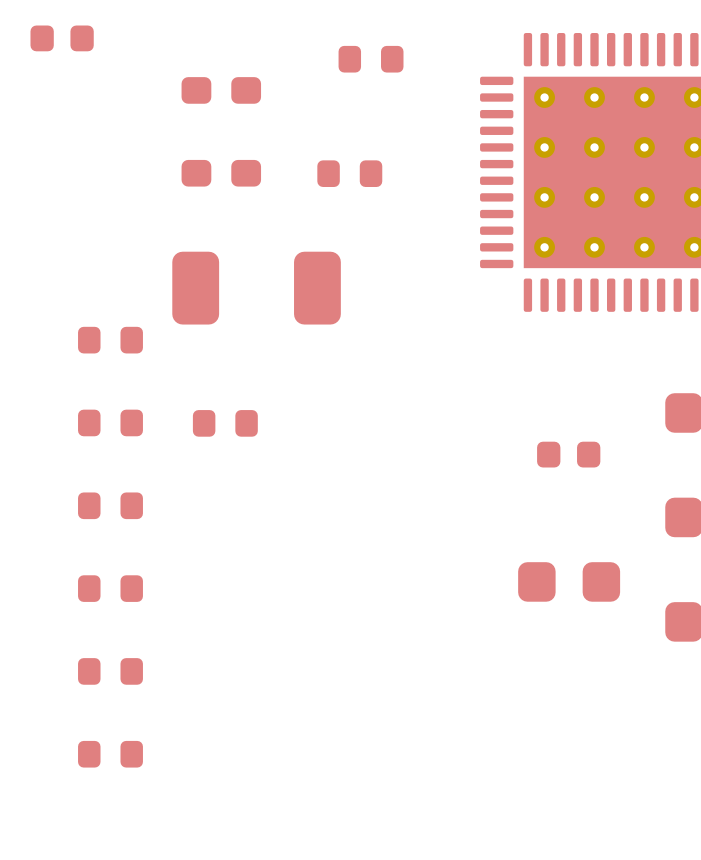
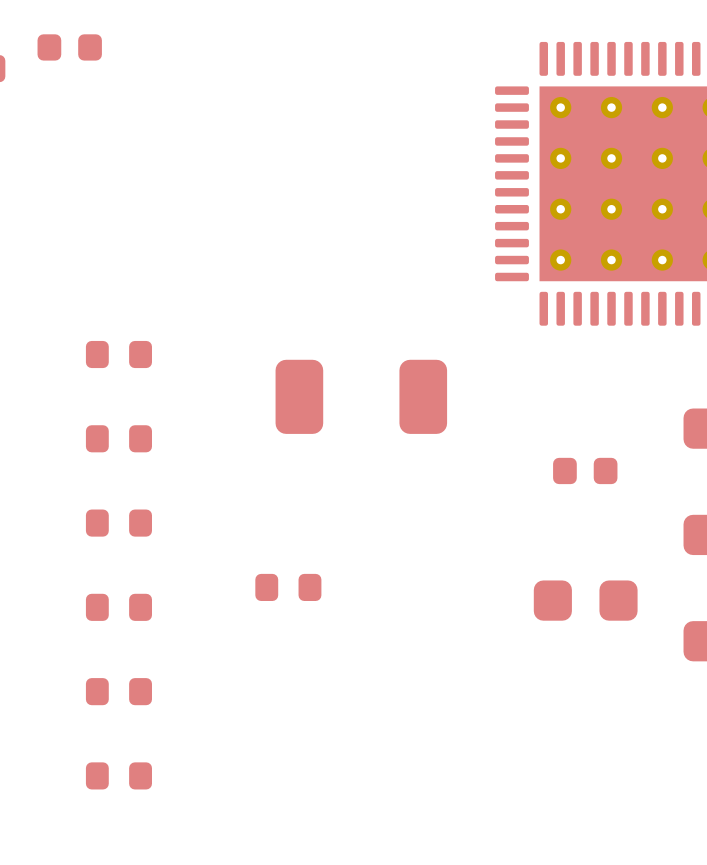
part: (371, 59) -> none
part: (221, 90) -> none
part: (221, 173) -> none
part: (349, 173) -> none
part position: (256, 288) -> (361, 396)
part position: (225, 423) -> (288, 587)

